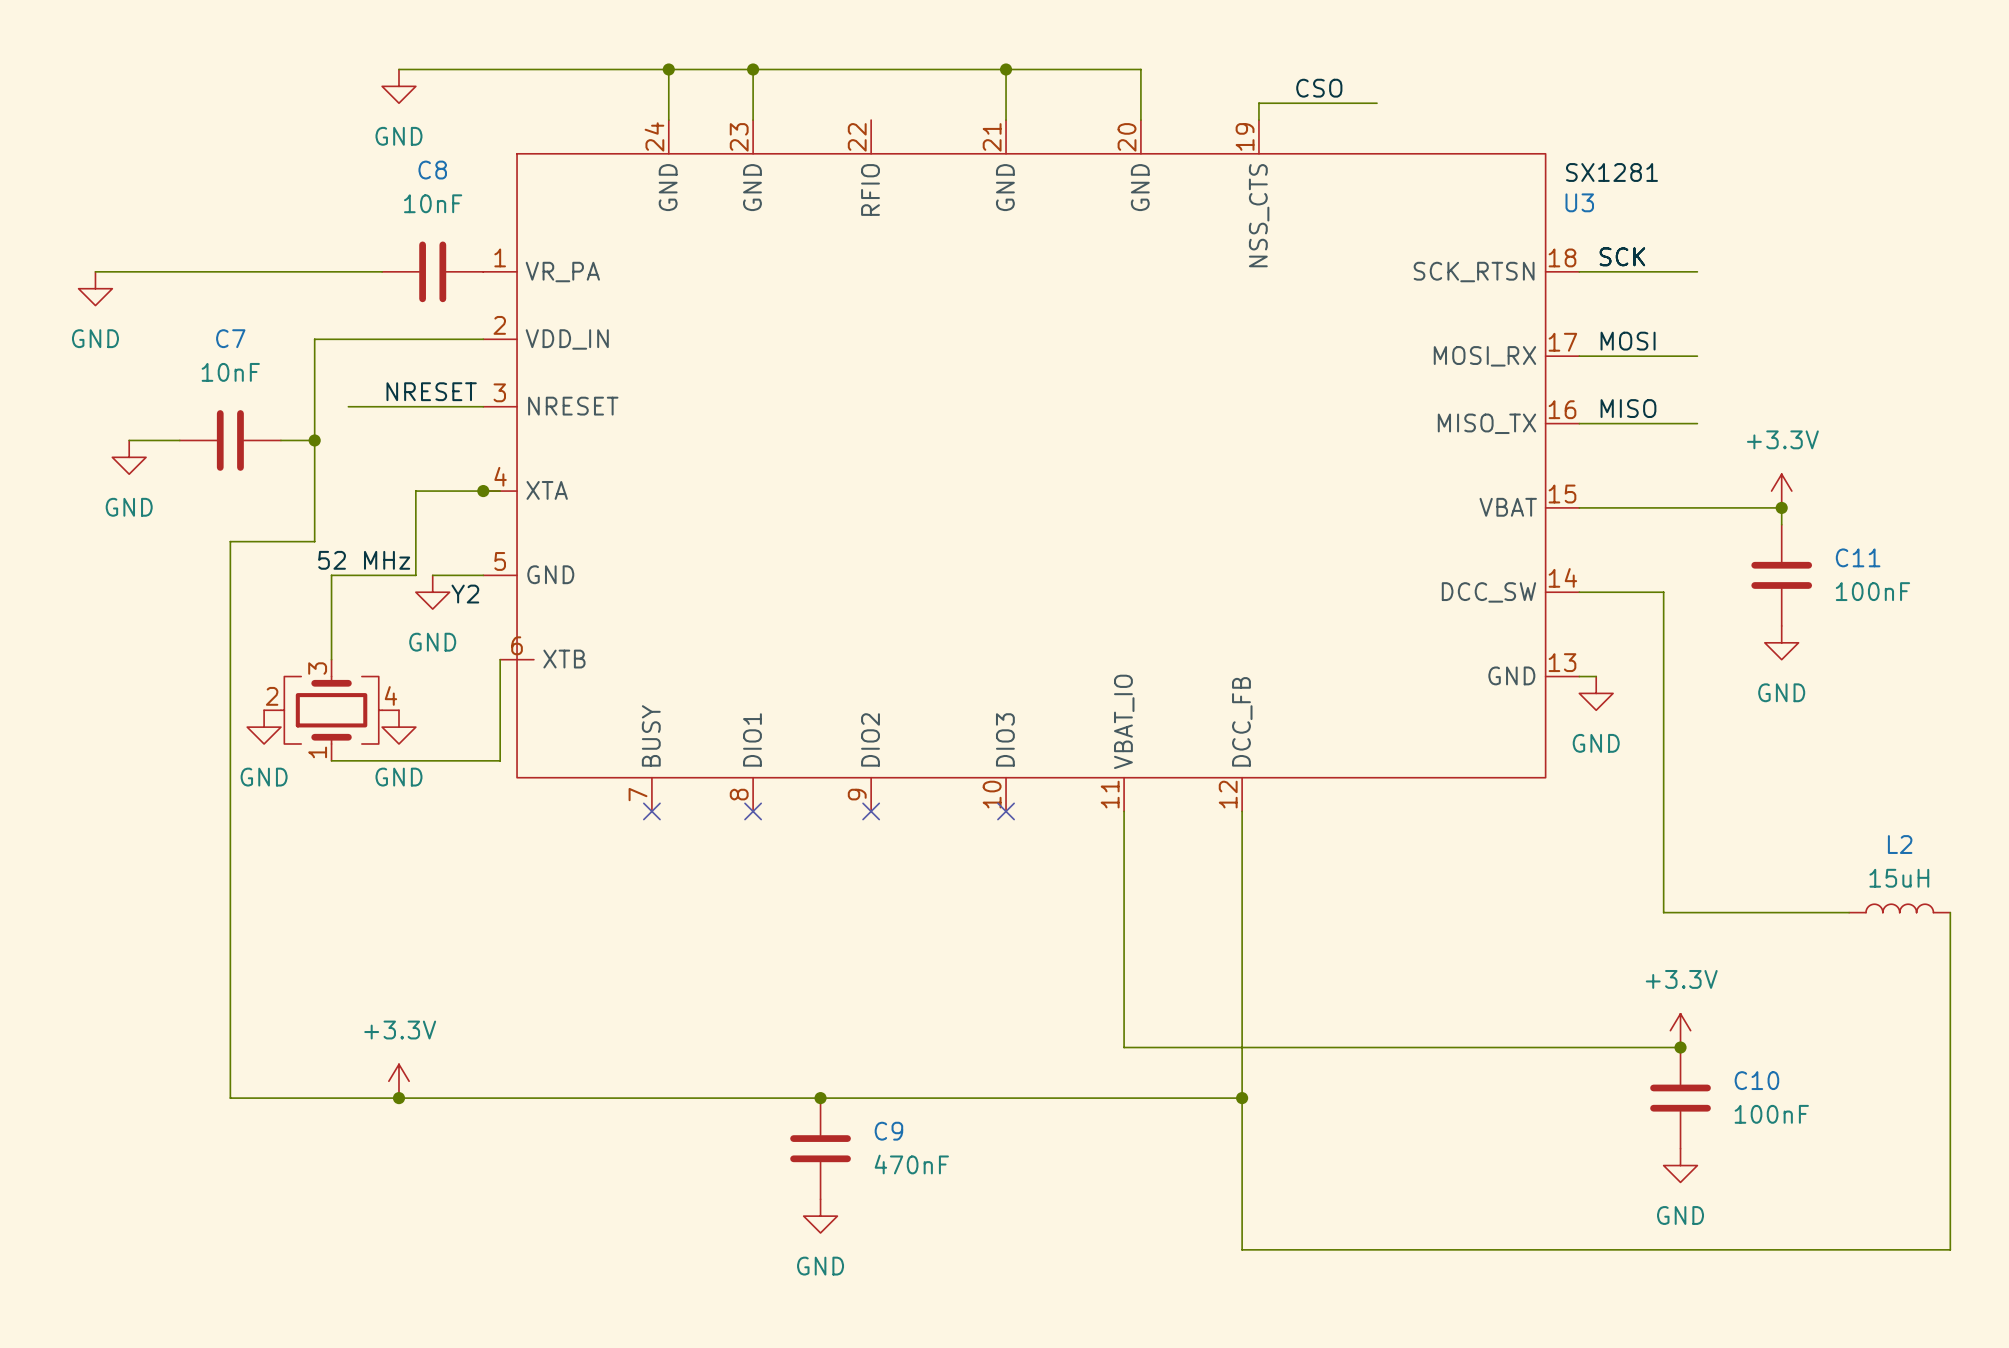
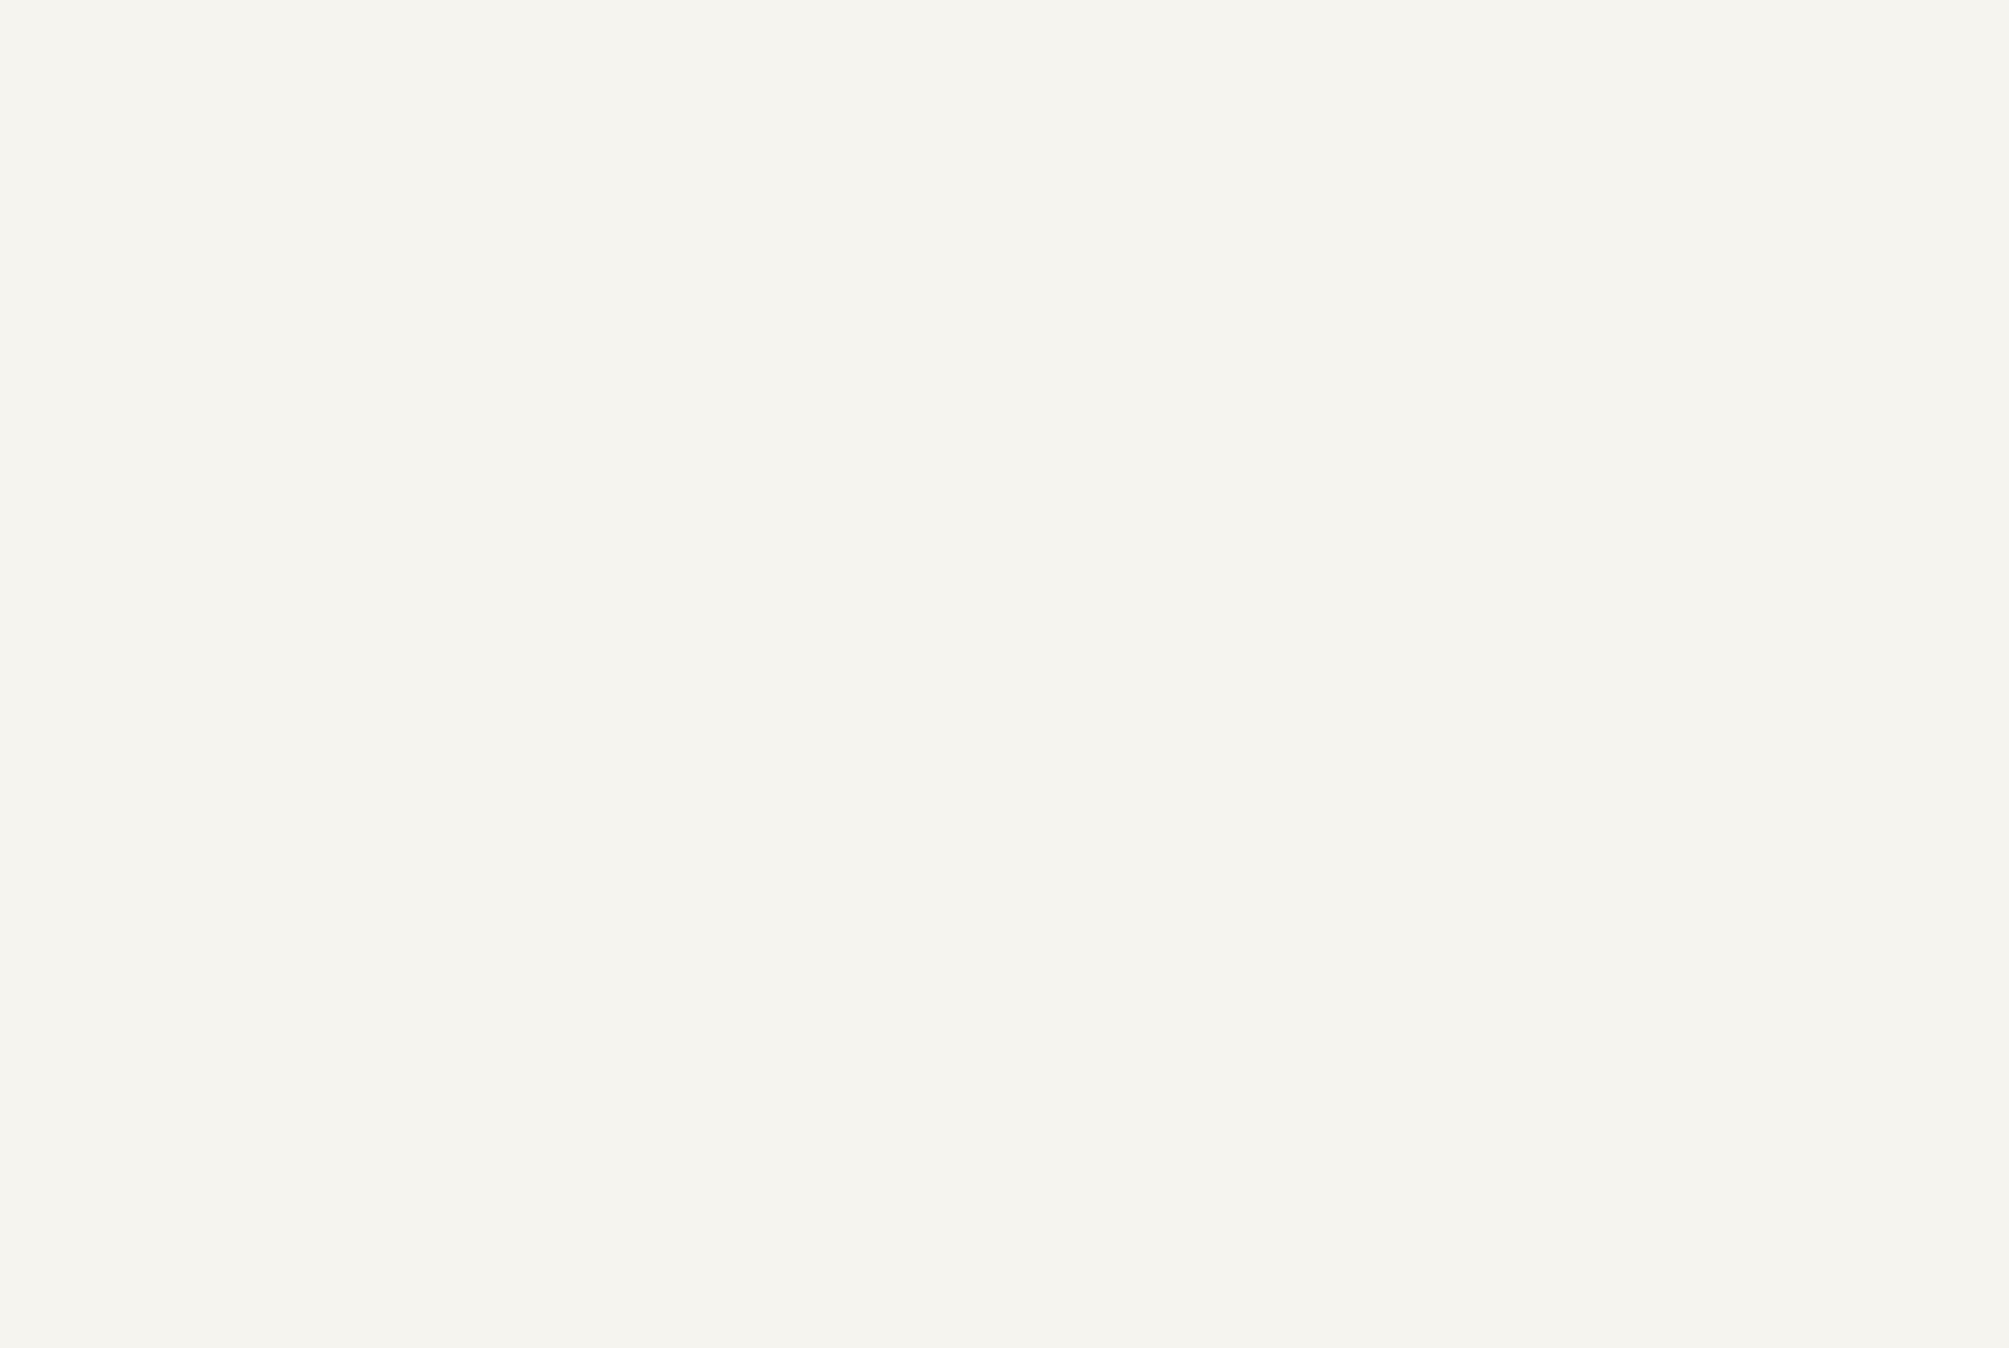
wire: (398, 69) (1140, 69) (1140, 120) -> none
wire: (668, 69) (668, 120) -> none
junction: (668, 69) -> none
wire: (753, 69) (753, 120) -> none
junction: (753, 69) -> none
wire: (1006, 69) (1006, 120) -> none
junction: (1006, 69) -> none
power symbol: GND (398, 86) -> none
label: CSO (1319, 88) -> none
wire: (1377, 103) (1258, 103) (1258, 120) -> none
label: SX1281 (1611, 172) -> none
label: SCK (1622, 256) -> none
wire: (95, 271) (382, 271) -> none
C8: 10nF (432, 271) -> none
wire: (1579, 271) (1697, 271) -> none
power symbol: GND (95, 288) -> none
wire: (483, 339) (314, 339) (314, 541) (230, 541) (230, 1098) (1242, 1098) -> none
label: MOSI (1628, 341) -> none
wire: (1579, 356) (1697, 356) -> none
label: NRESET (431, 391) -> none
wire: (348, 406) (483, 406) -> none
label: MISO (1628, 408) -> none
wire: (1579, 423) (1697, 423) -> none
wire: (129, 440) (179, 440) -> none
C7: 10nF (230, 440) -> none
wire: (280, 440) (314, 440) -> none
junction: (314, 440) -> none
power symbol: GND (129, 457) -> none
U3: (1031, 465) -> none
junction: (483, 491) -> none
wire: (500, 491) (415, 491) (415, 575) (331, 575) (331, 659) -> none
power symbol: +3.3V (1781, 491) -> none
wire: (1579, 507) (1781, 507) (1781, 524) -> none
junction: (1781, 507) -> none
label: 52 MHz (364, 560) -> none
wire: (432, 575) (483, 575) -> none
C11: 100nF (1781, 575) -> none
power symbol: GND (432, 592) -> none
wire: (1579, 592) (1663, 592) (1663, 912) (1849, 912) -> none
label: Y2 (465, 594) -> none
power symbol: GND (1781, 642) -> none
wire: (500, 659) (500, 760) (331, 760) -> none
wire: (1579, 676) (1596, 676) -> none
power symbol: GND (1596, 693) -> none
part: (331, 710) -> none
power symbol: GND (264, 727) -> none
power symbol: GND (398, 727) -> none
no-connect mark: (651, 811) -> none
no-connect mark: (753, 811) -> none
no-connect mark: (871, 811) -> none
no-connect mark: (1006, 811) -> none
wire: (1124, 811) (1124, 1047) (1680, 1047) -> none
wire: (1242, 811) (1242, 1249) (1950, 1249) (1950, 912) -> none
L2: 15uH (1899, 908) -> none
power symbol: +3.3V (1680, 1030) -> none
junction: (1680, 1047) -> none
power symbol: +3.3V (398, 1081) -> none
junction: (398, 1098) -> none
junction: (820, 1098) -> none
junction: (1242, 1098) -> none
C10: 100nF (1680, 1098) -> none
C9: 470nF (820, 1148) -> none
power symbol: GND (1680, 1165) -> none
power symbol: GND (820, 1216) -> none

